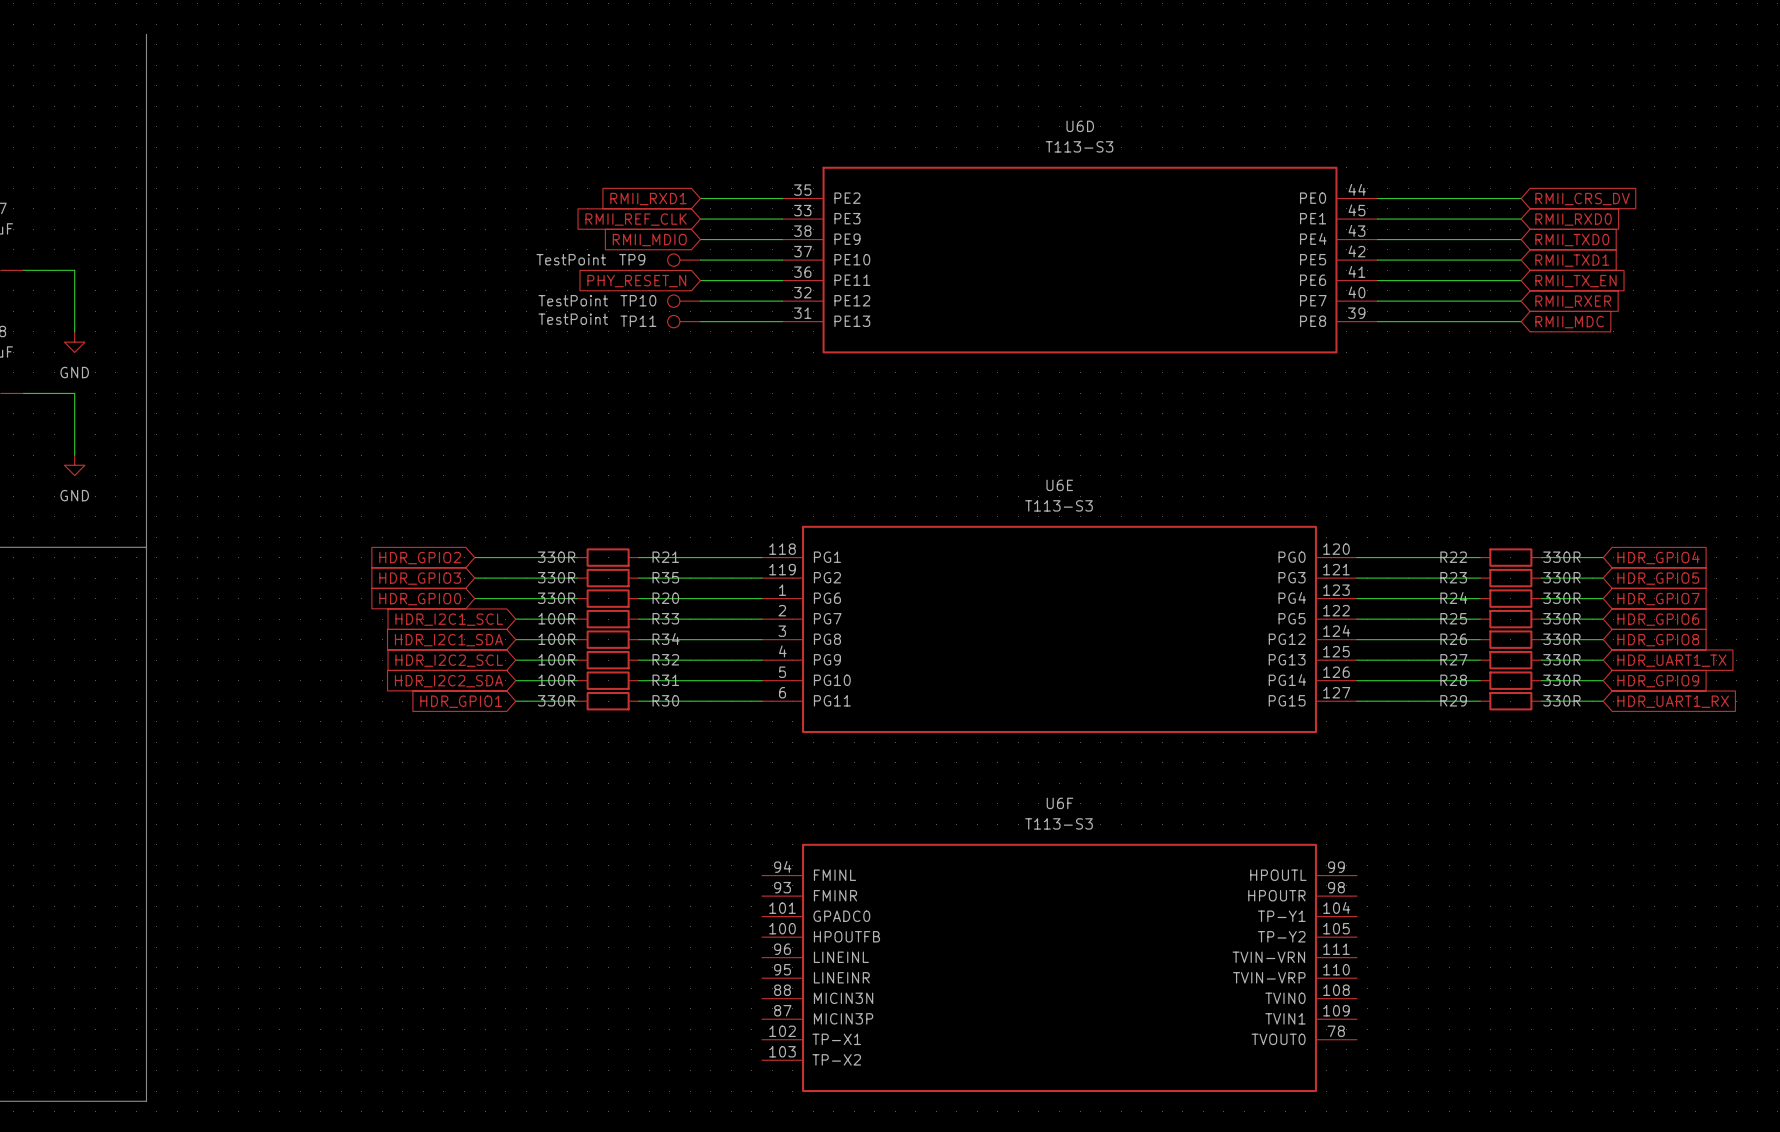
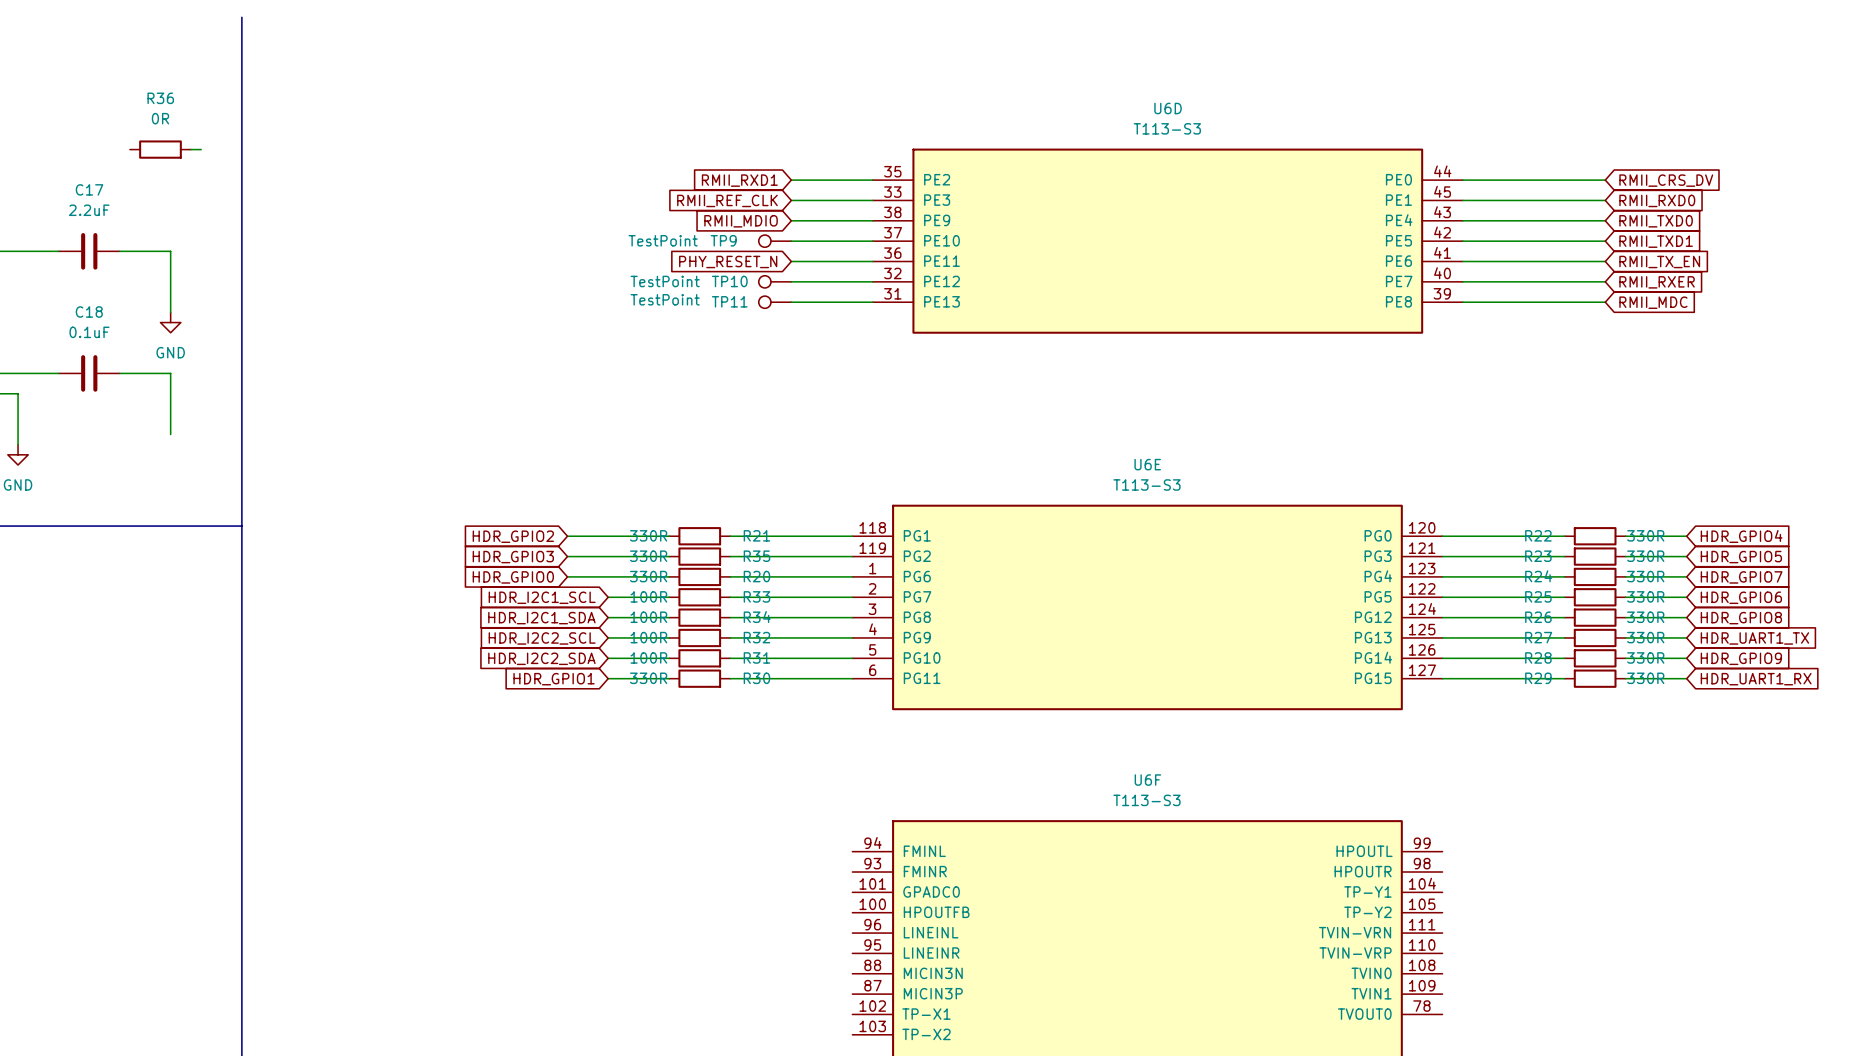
R36: none -> 0R (160, 149)
wire: none -> (191, 149) (201, 149)
power symbol: GND (74, 465) -> none

